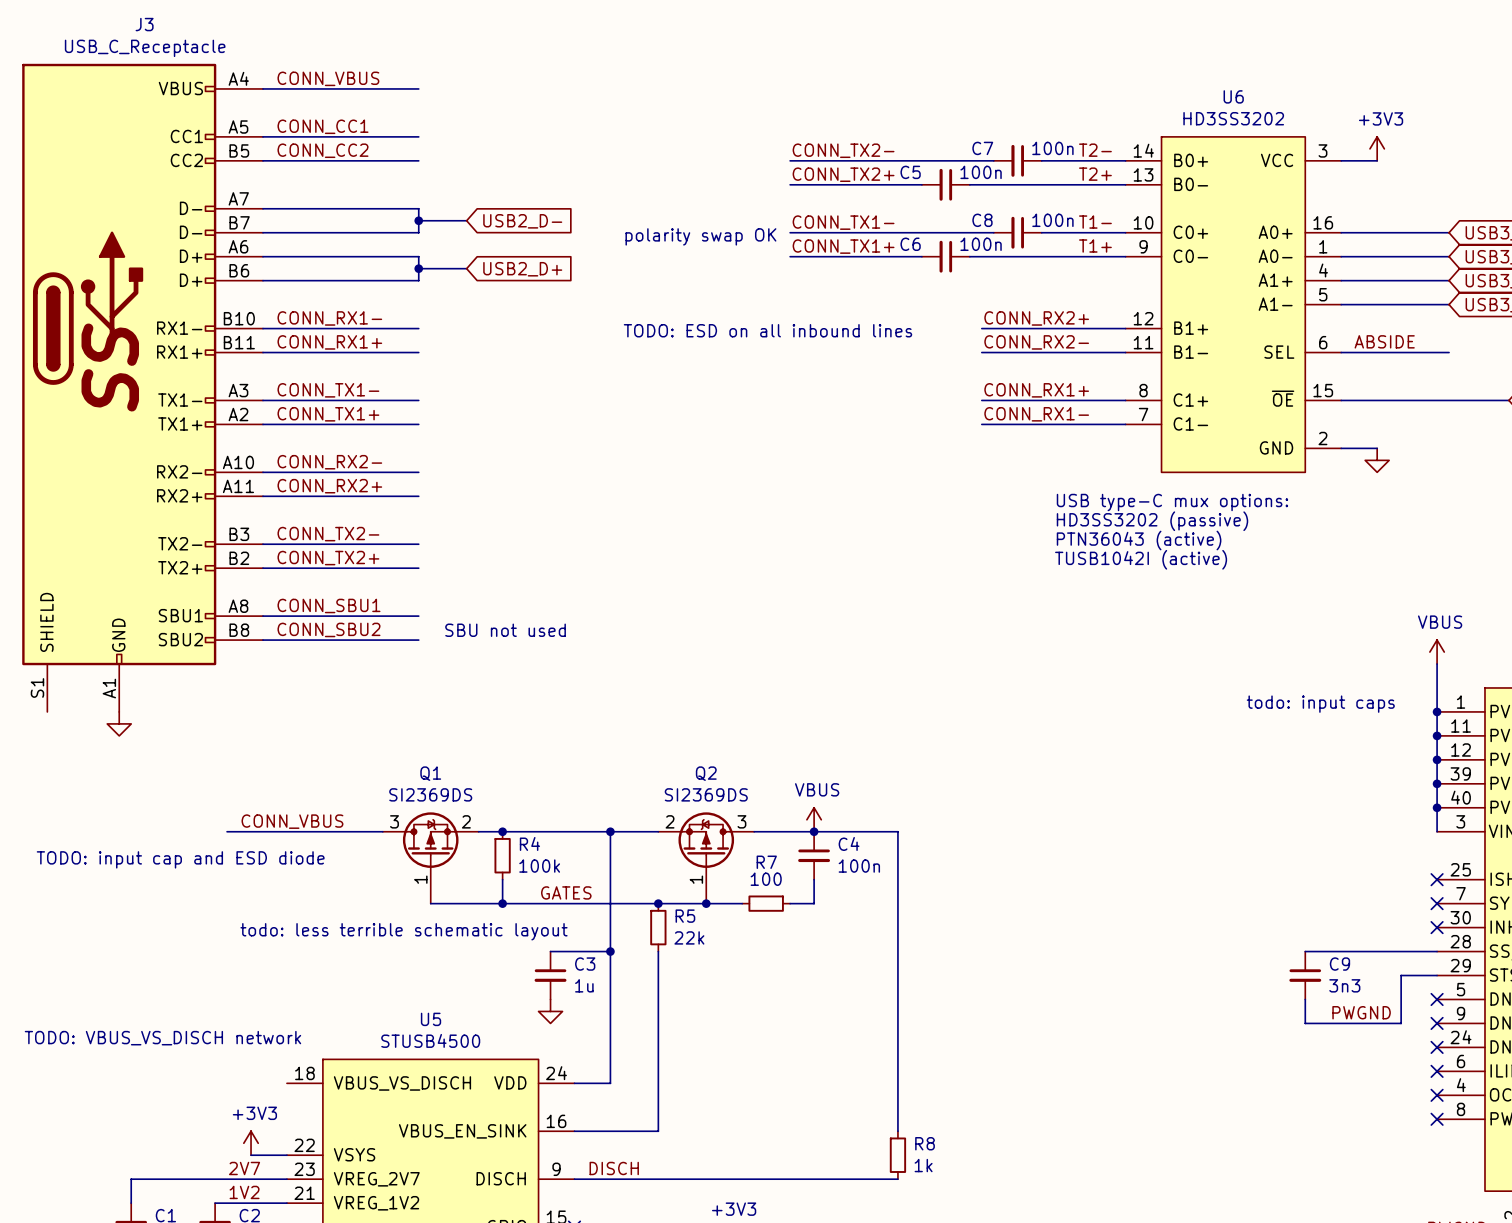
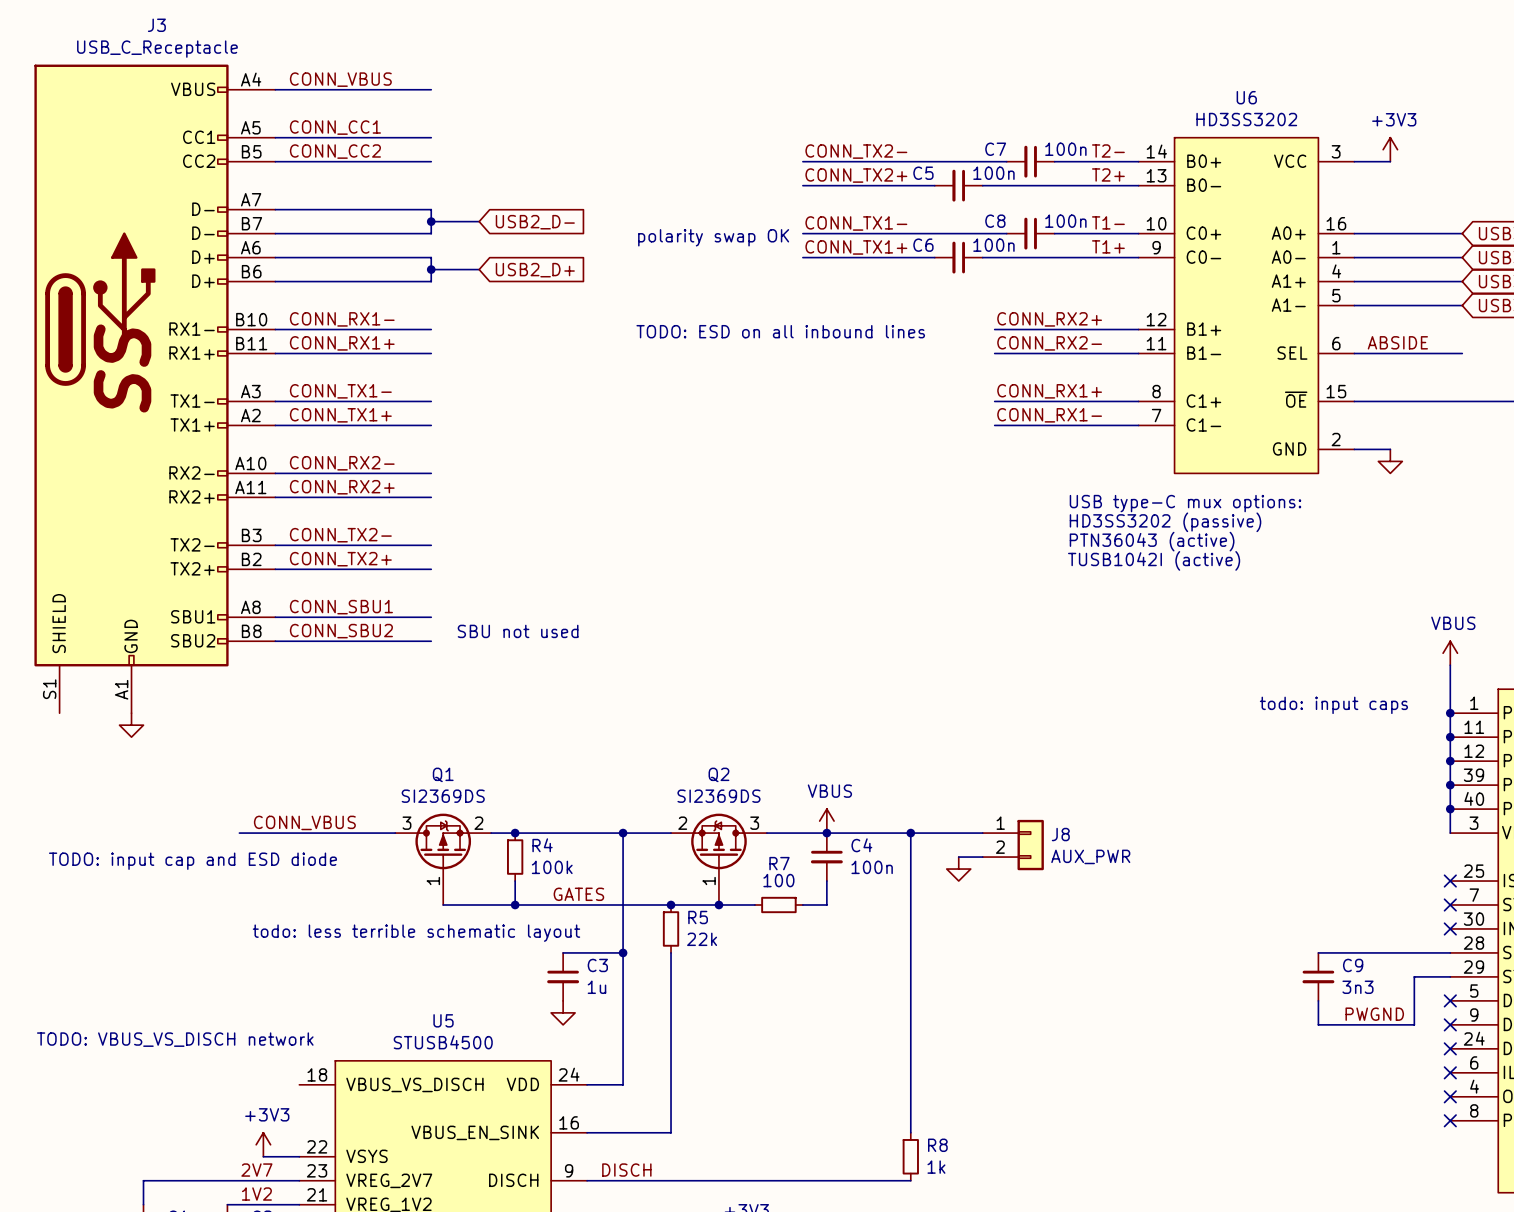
wire: none -> (910, 833) (982, 833)
junction: none -> (910, 833)
J8: none -> AUX_PWR (1013, 845)
wire: none -> (958, 857) (982, 857)
power symbol: none -> (958, 869)

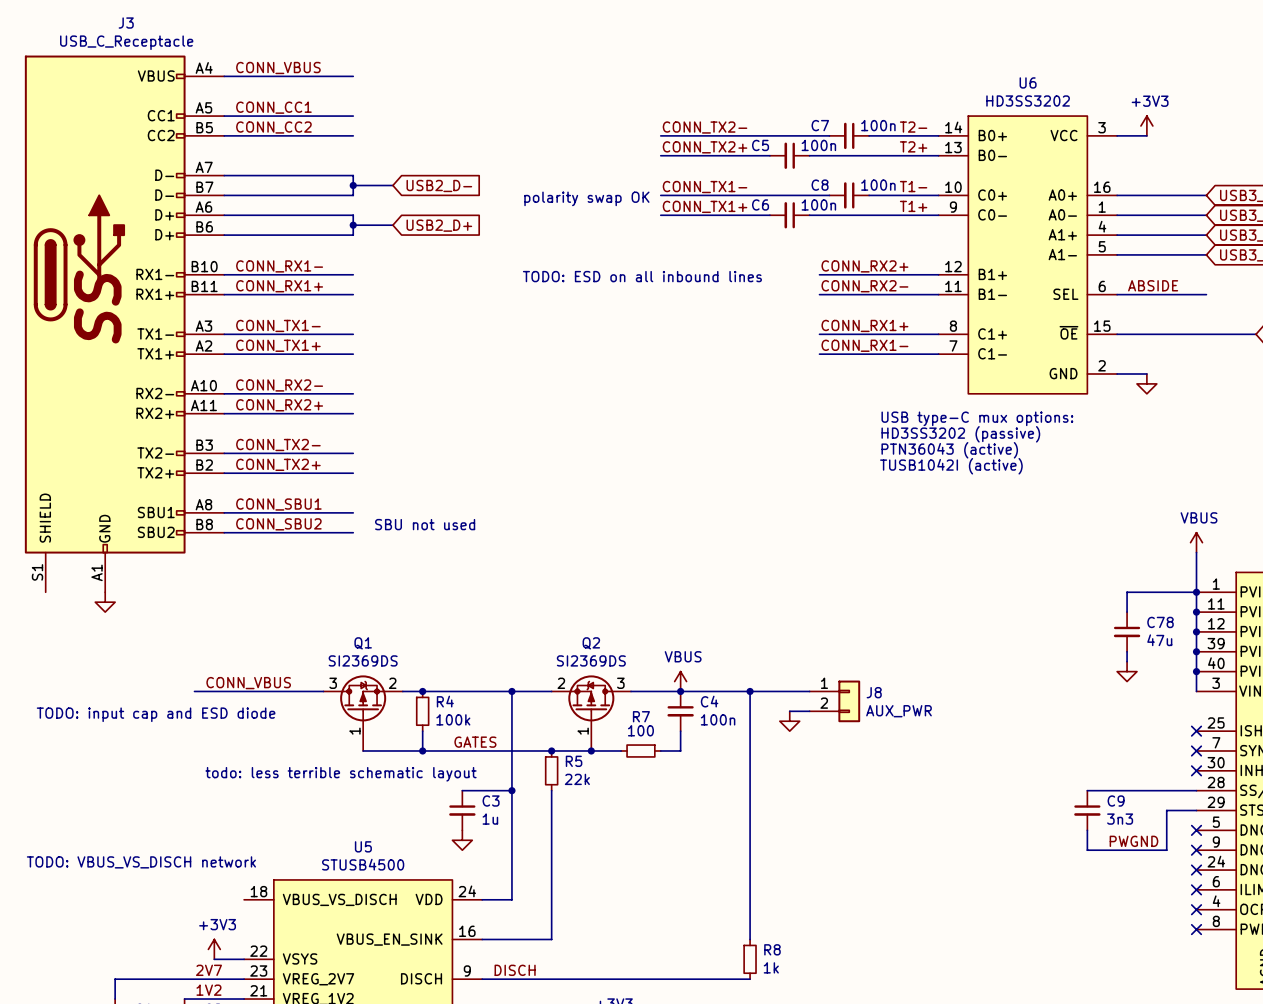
text: todo: input caps (1333, 705) -> none
wire: none -> (1196, 592) (1127, 592) (1127, 612)
C78: none -> 47u (1127, 631)
wire: none -> (1127, 651) (1127, 661)
power symbol: none -> (1127, 671)

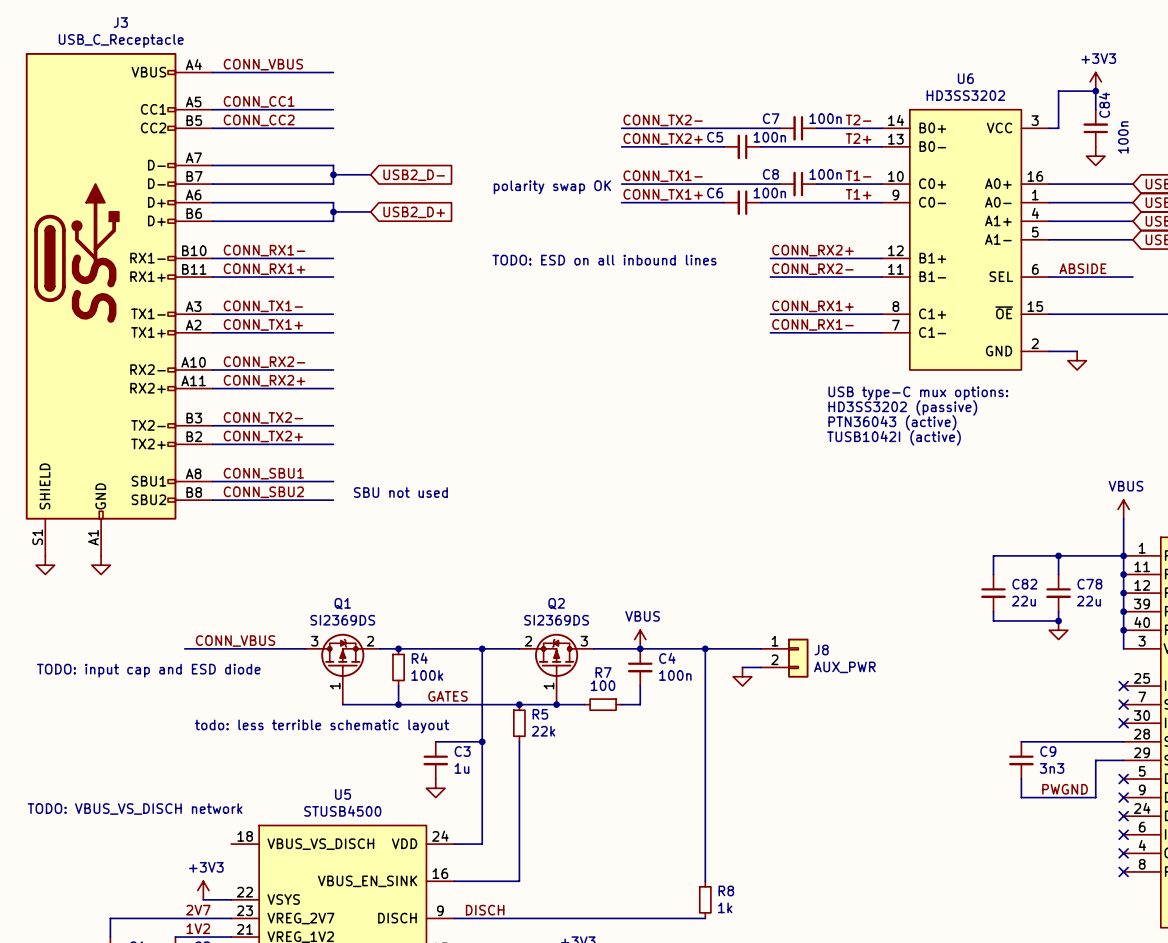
junction: none -> (1095, 91)
power symbol position: +3V3 (1146, 125) -> +3V3 (1095, 81)
wire: (1127, 135) (1146, 135) -> (1058, 128) (1058, 91) (1095, 91) (1095, 109)
C84: none -> 100n (1095, 128)
power symbol: none -> (1095, 156)
wire: none -> (1058, 555) (993, 555) (993, 574)
junction: none -> (1058, 555)
power symbol: none -> (45, 565)
C82: none -> 22u (993, 593)
C78 value: 47u (1159, 640) -> 22u (1089, 601)
wire: none -> (993, 611) (993, 620) (1058, 620)
junction: none -> (1058, 620)

